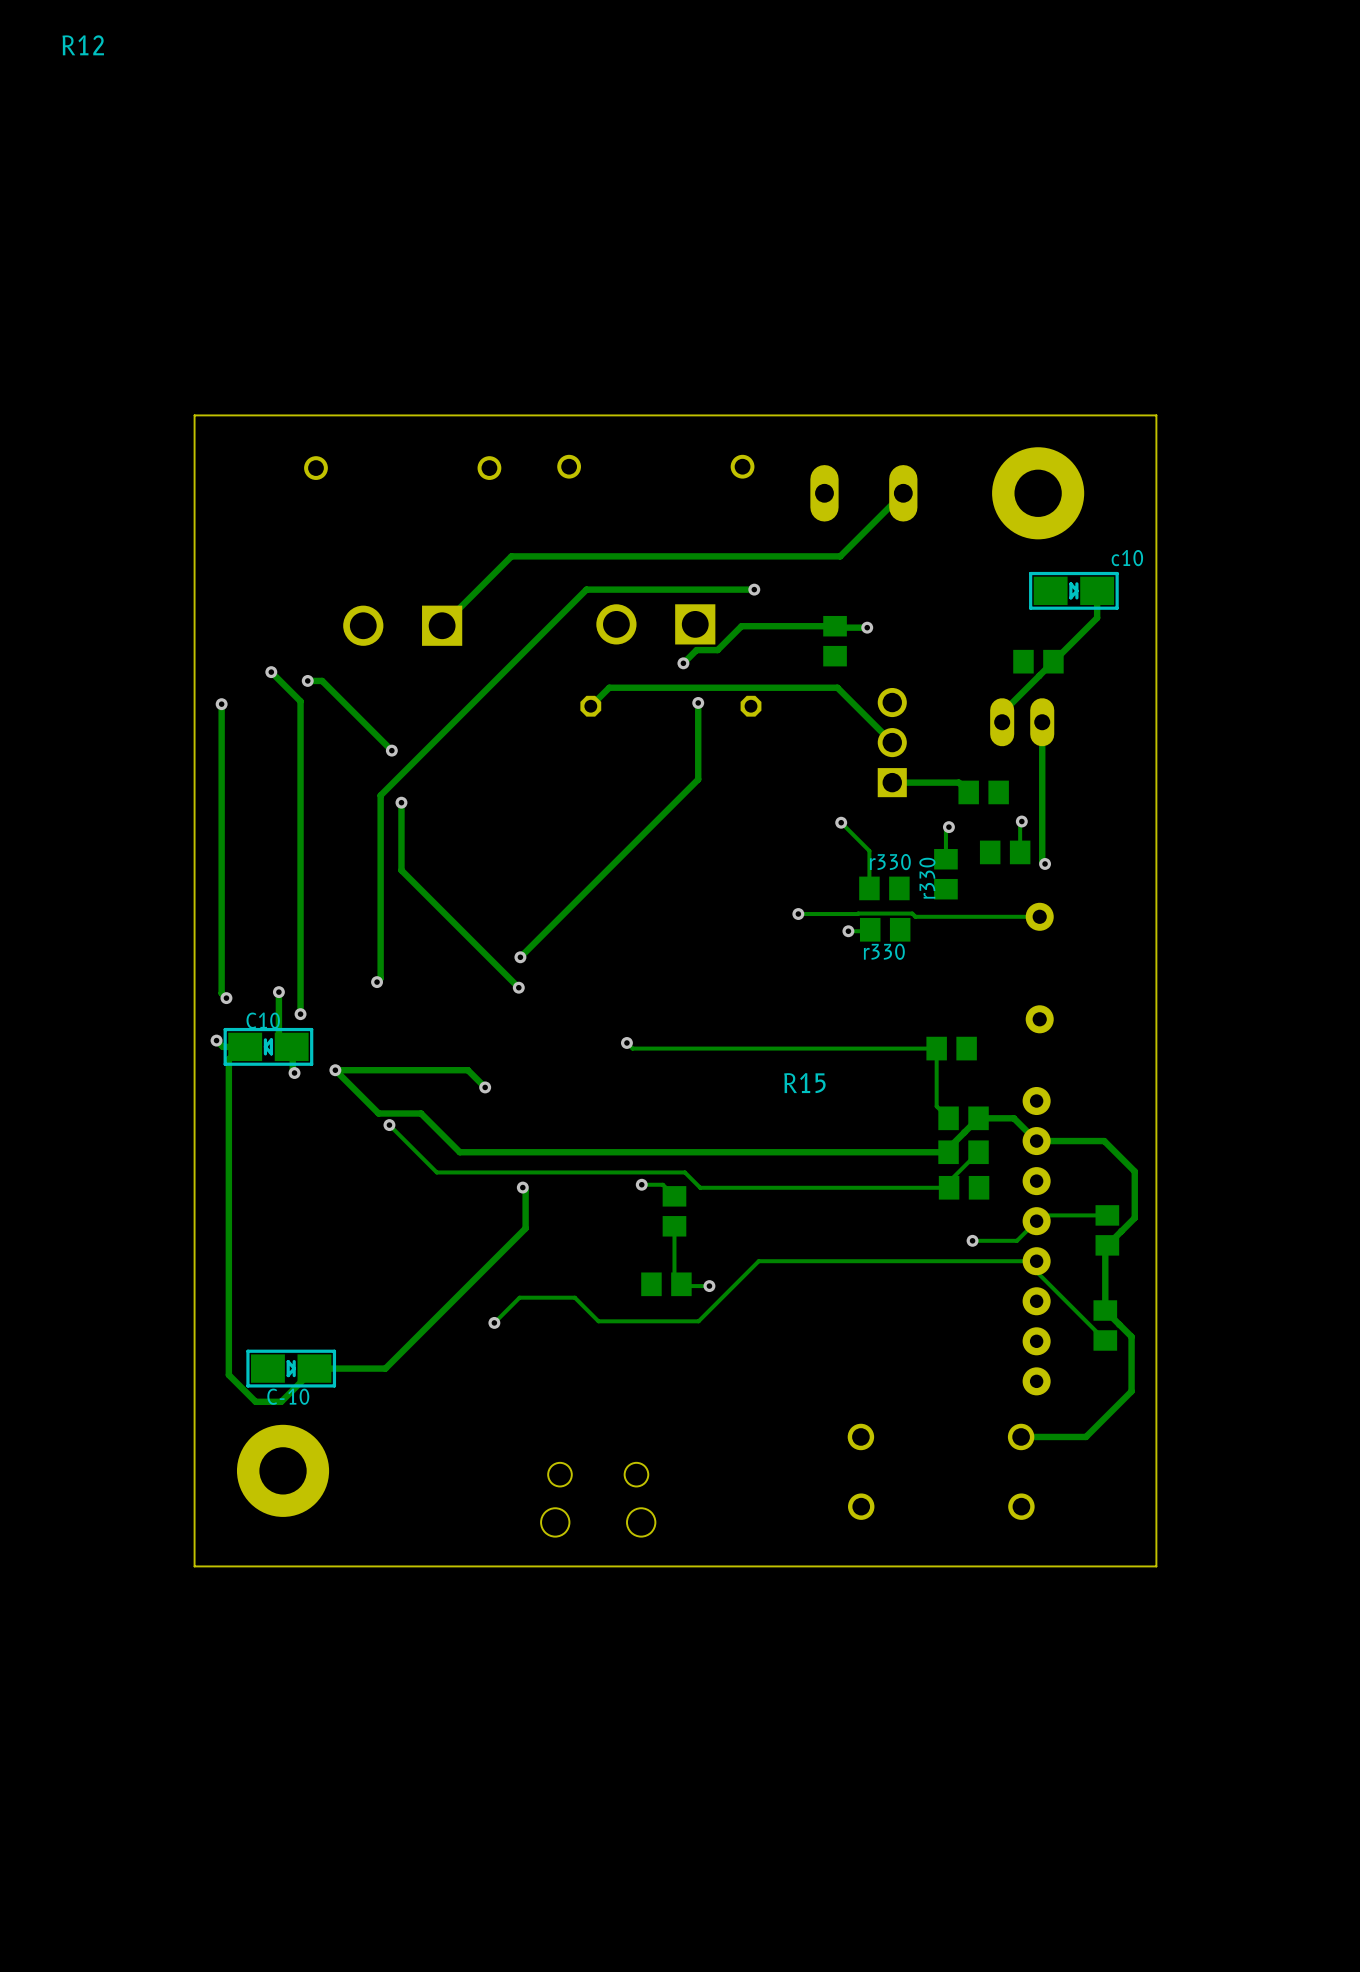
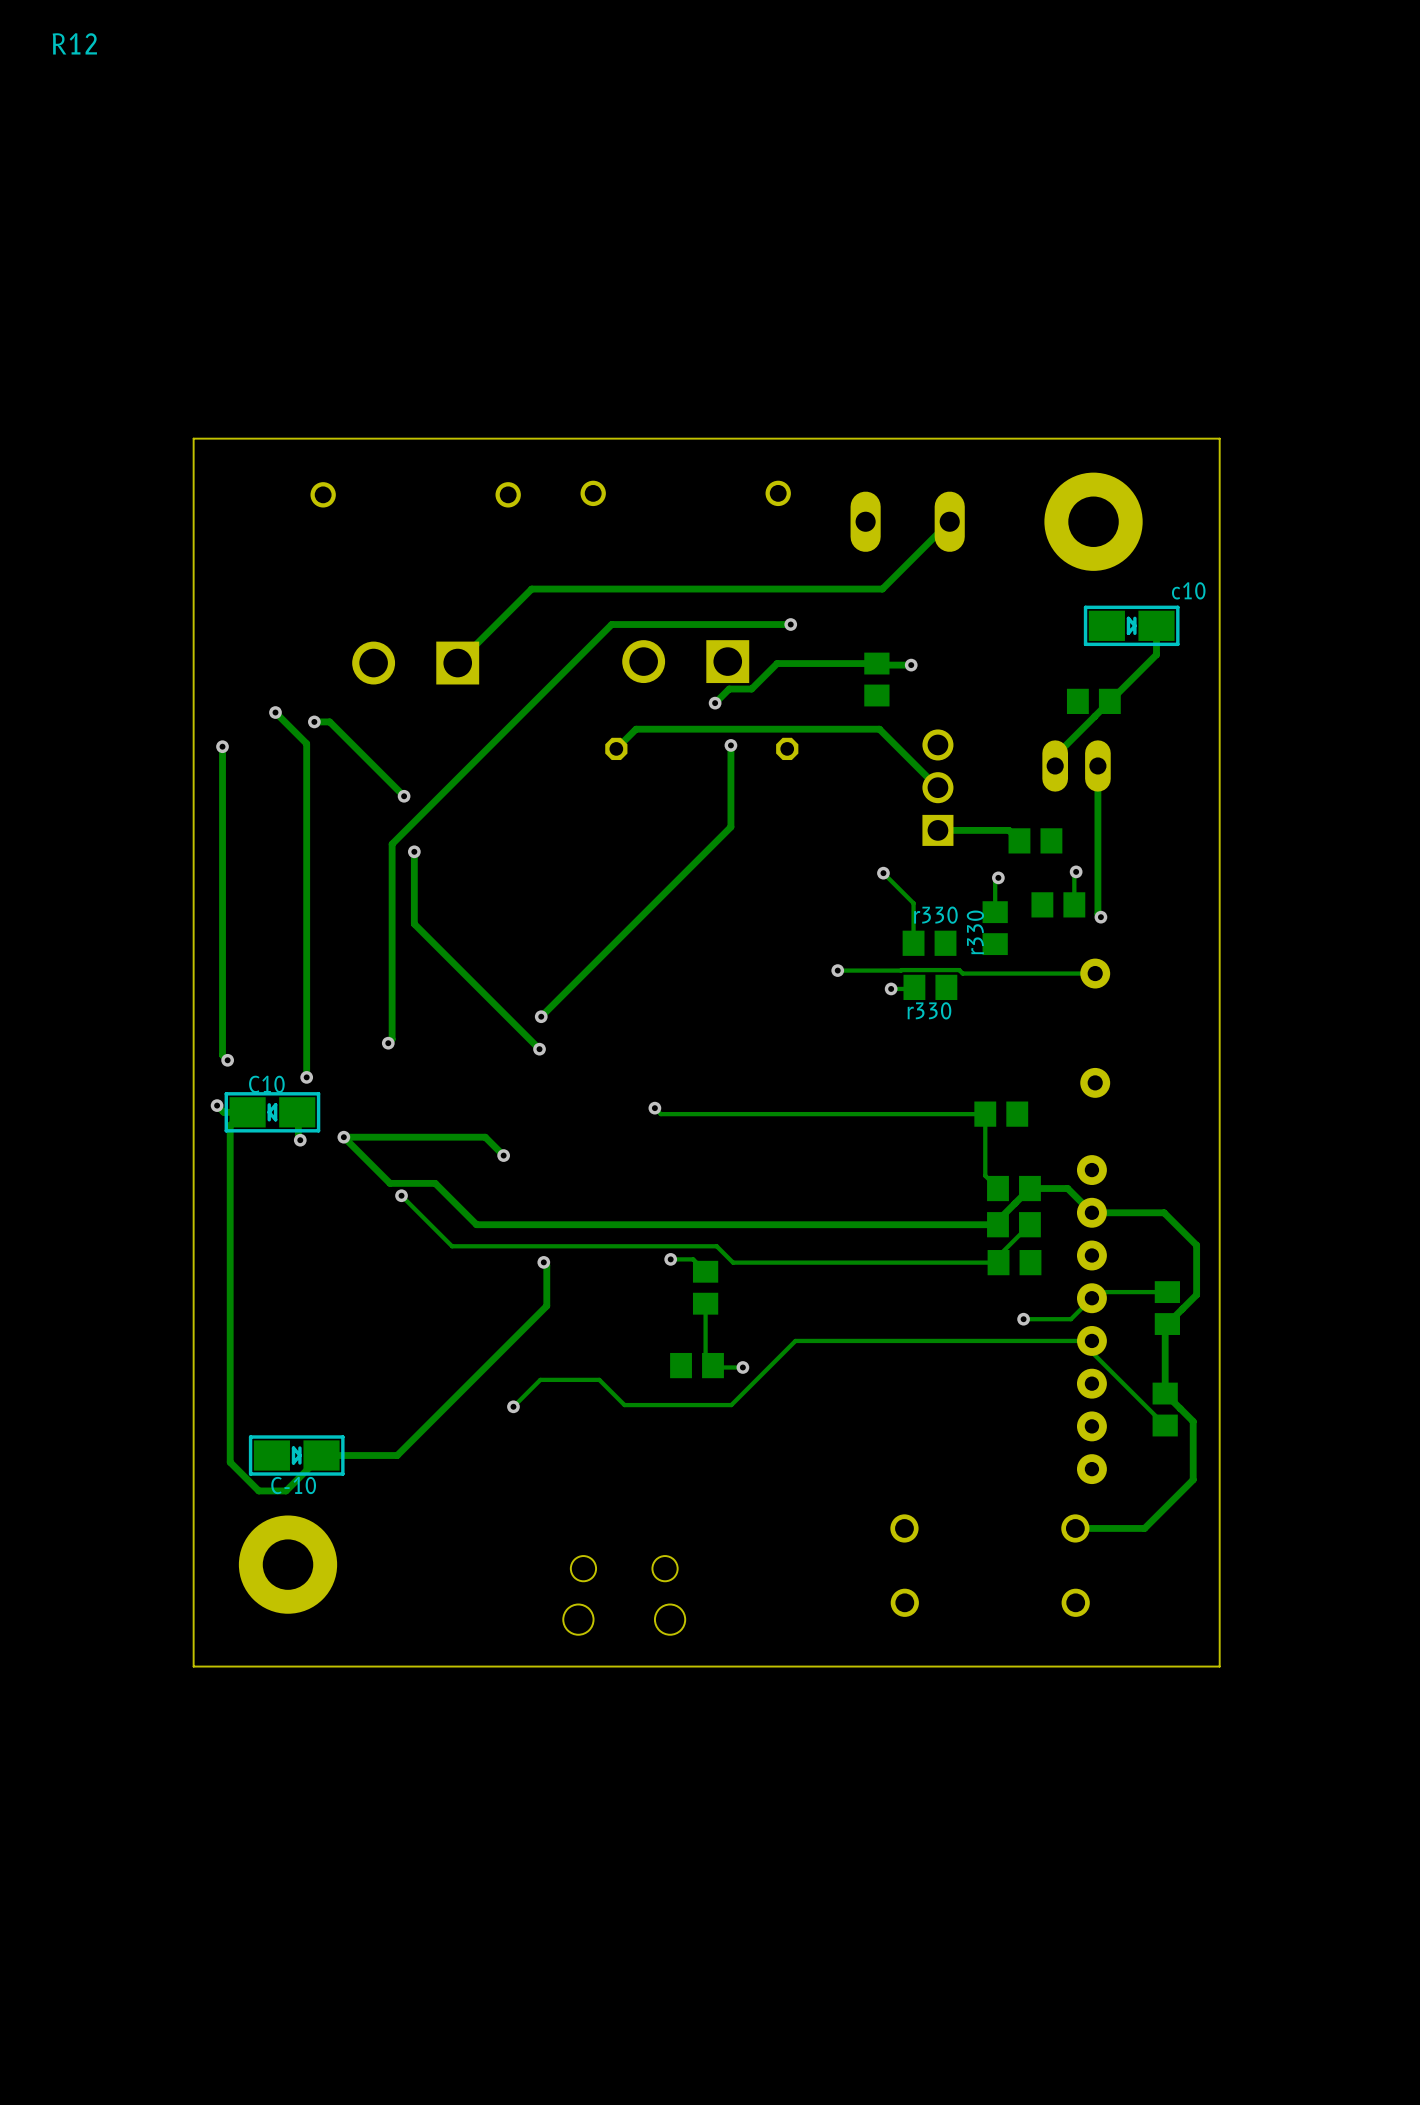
track: (278, 992) (278, 1034) (291, 1046) -> none
via: (278, 992) -> none
R15 name: R15 (804, 1083) -> none

